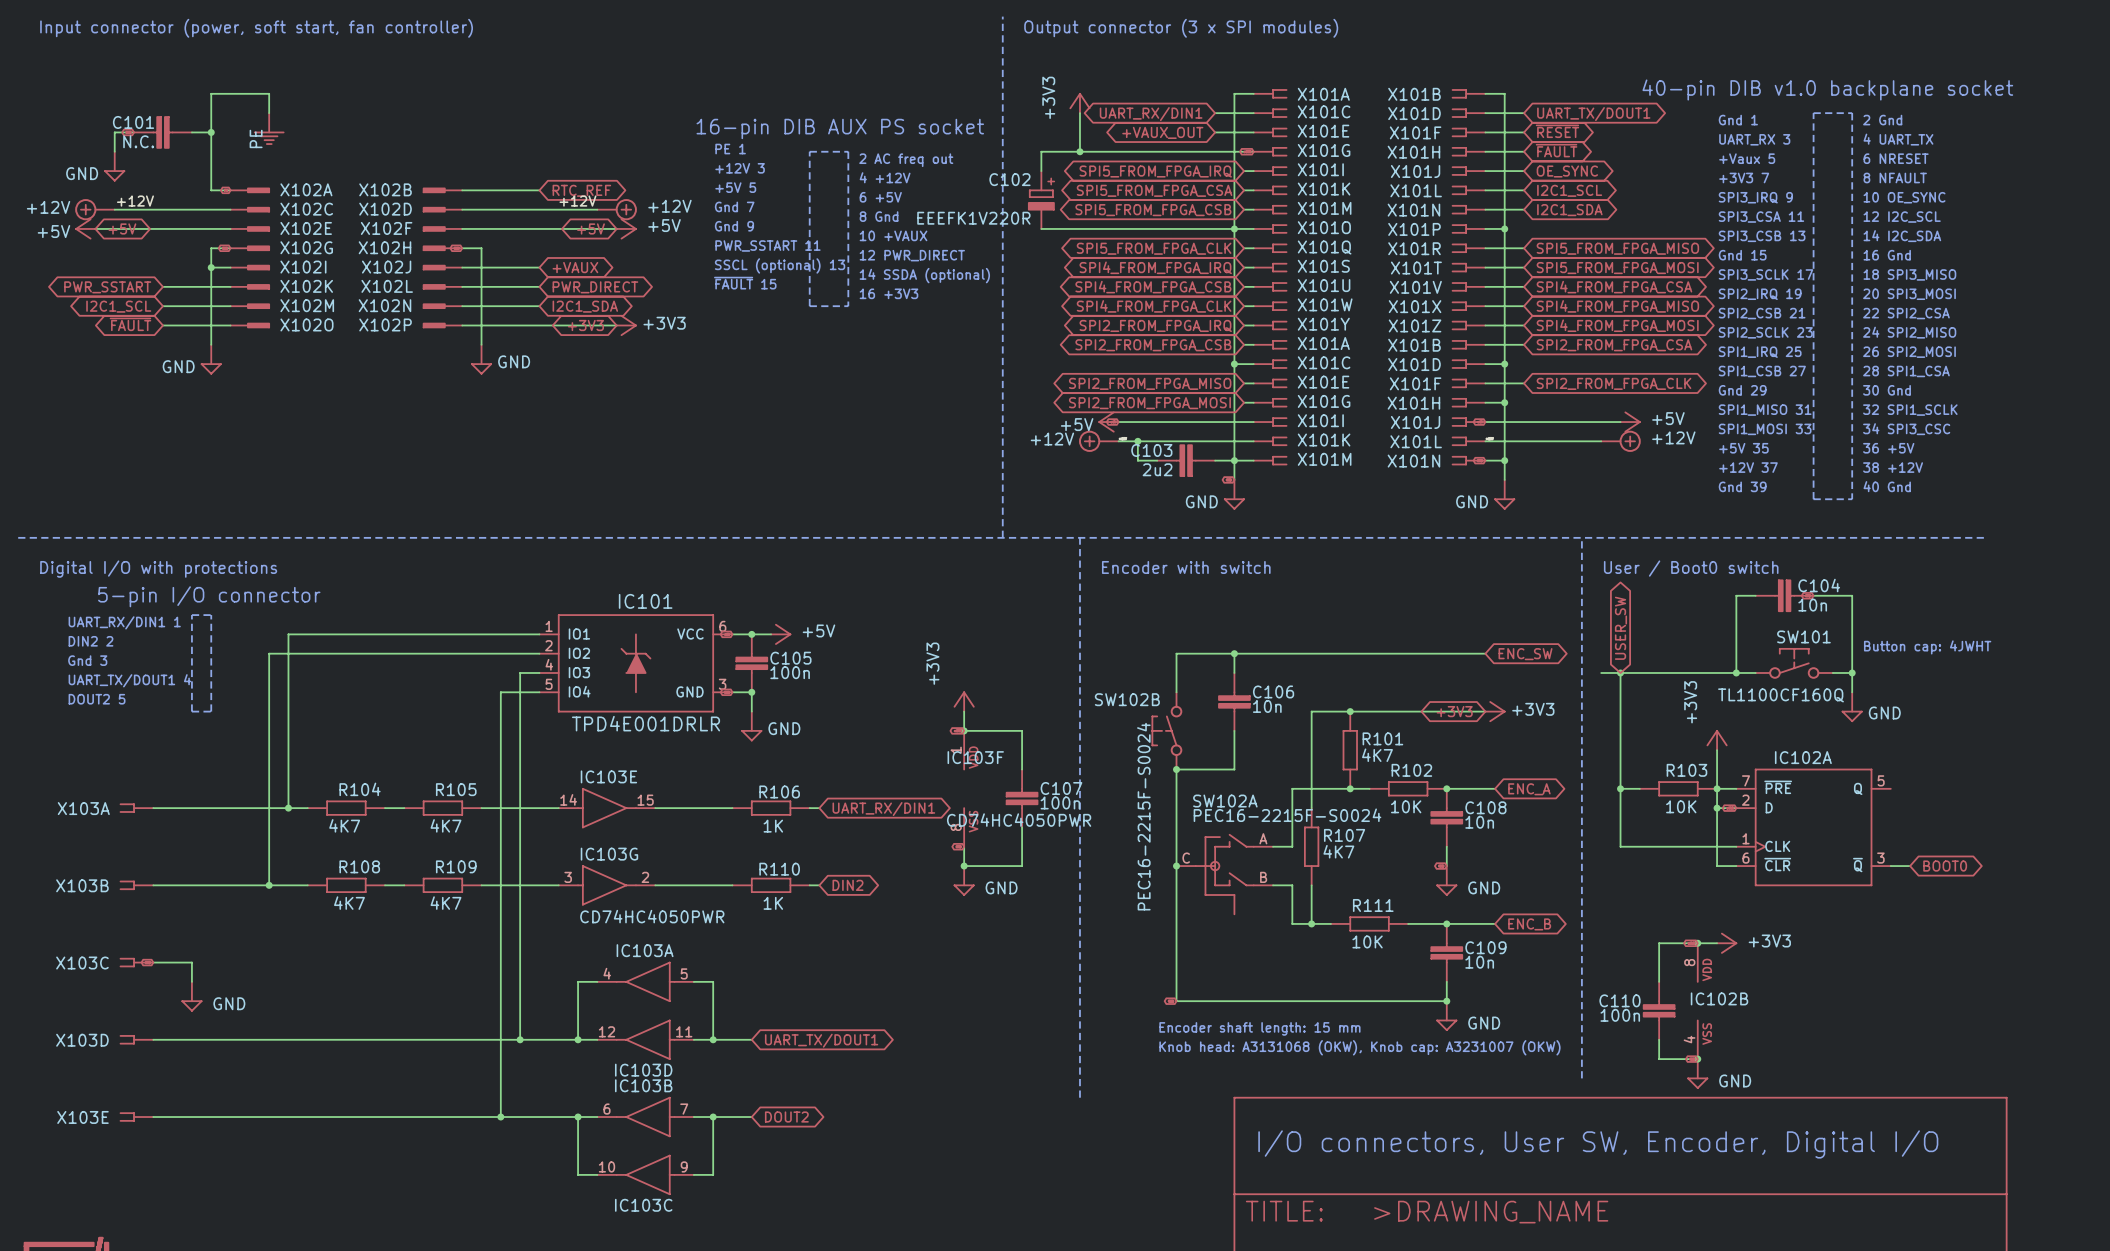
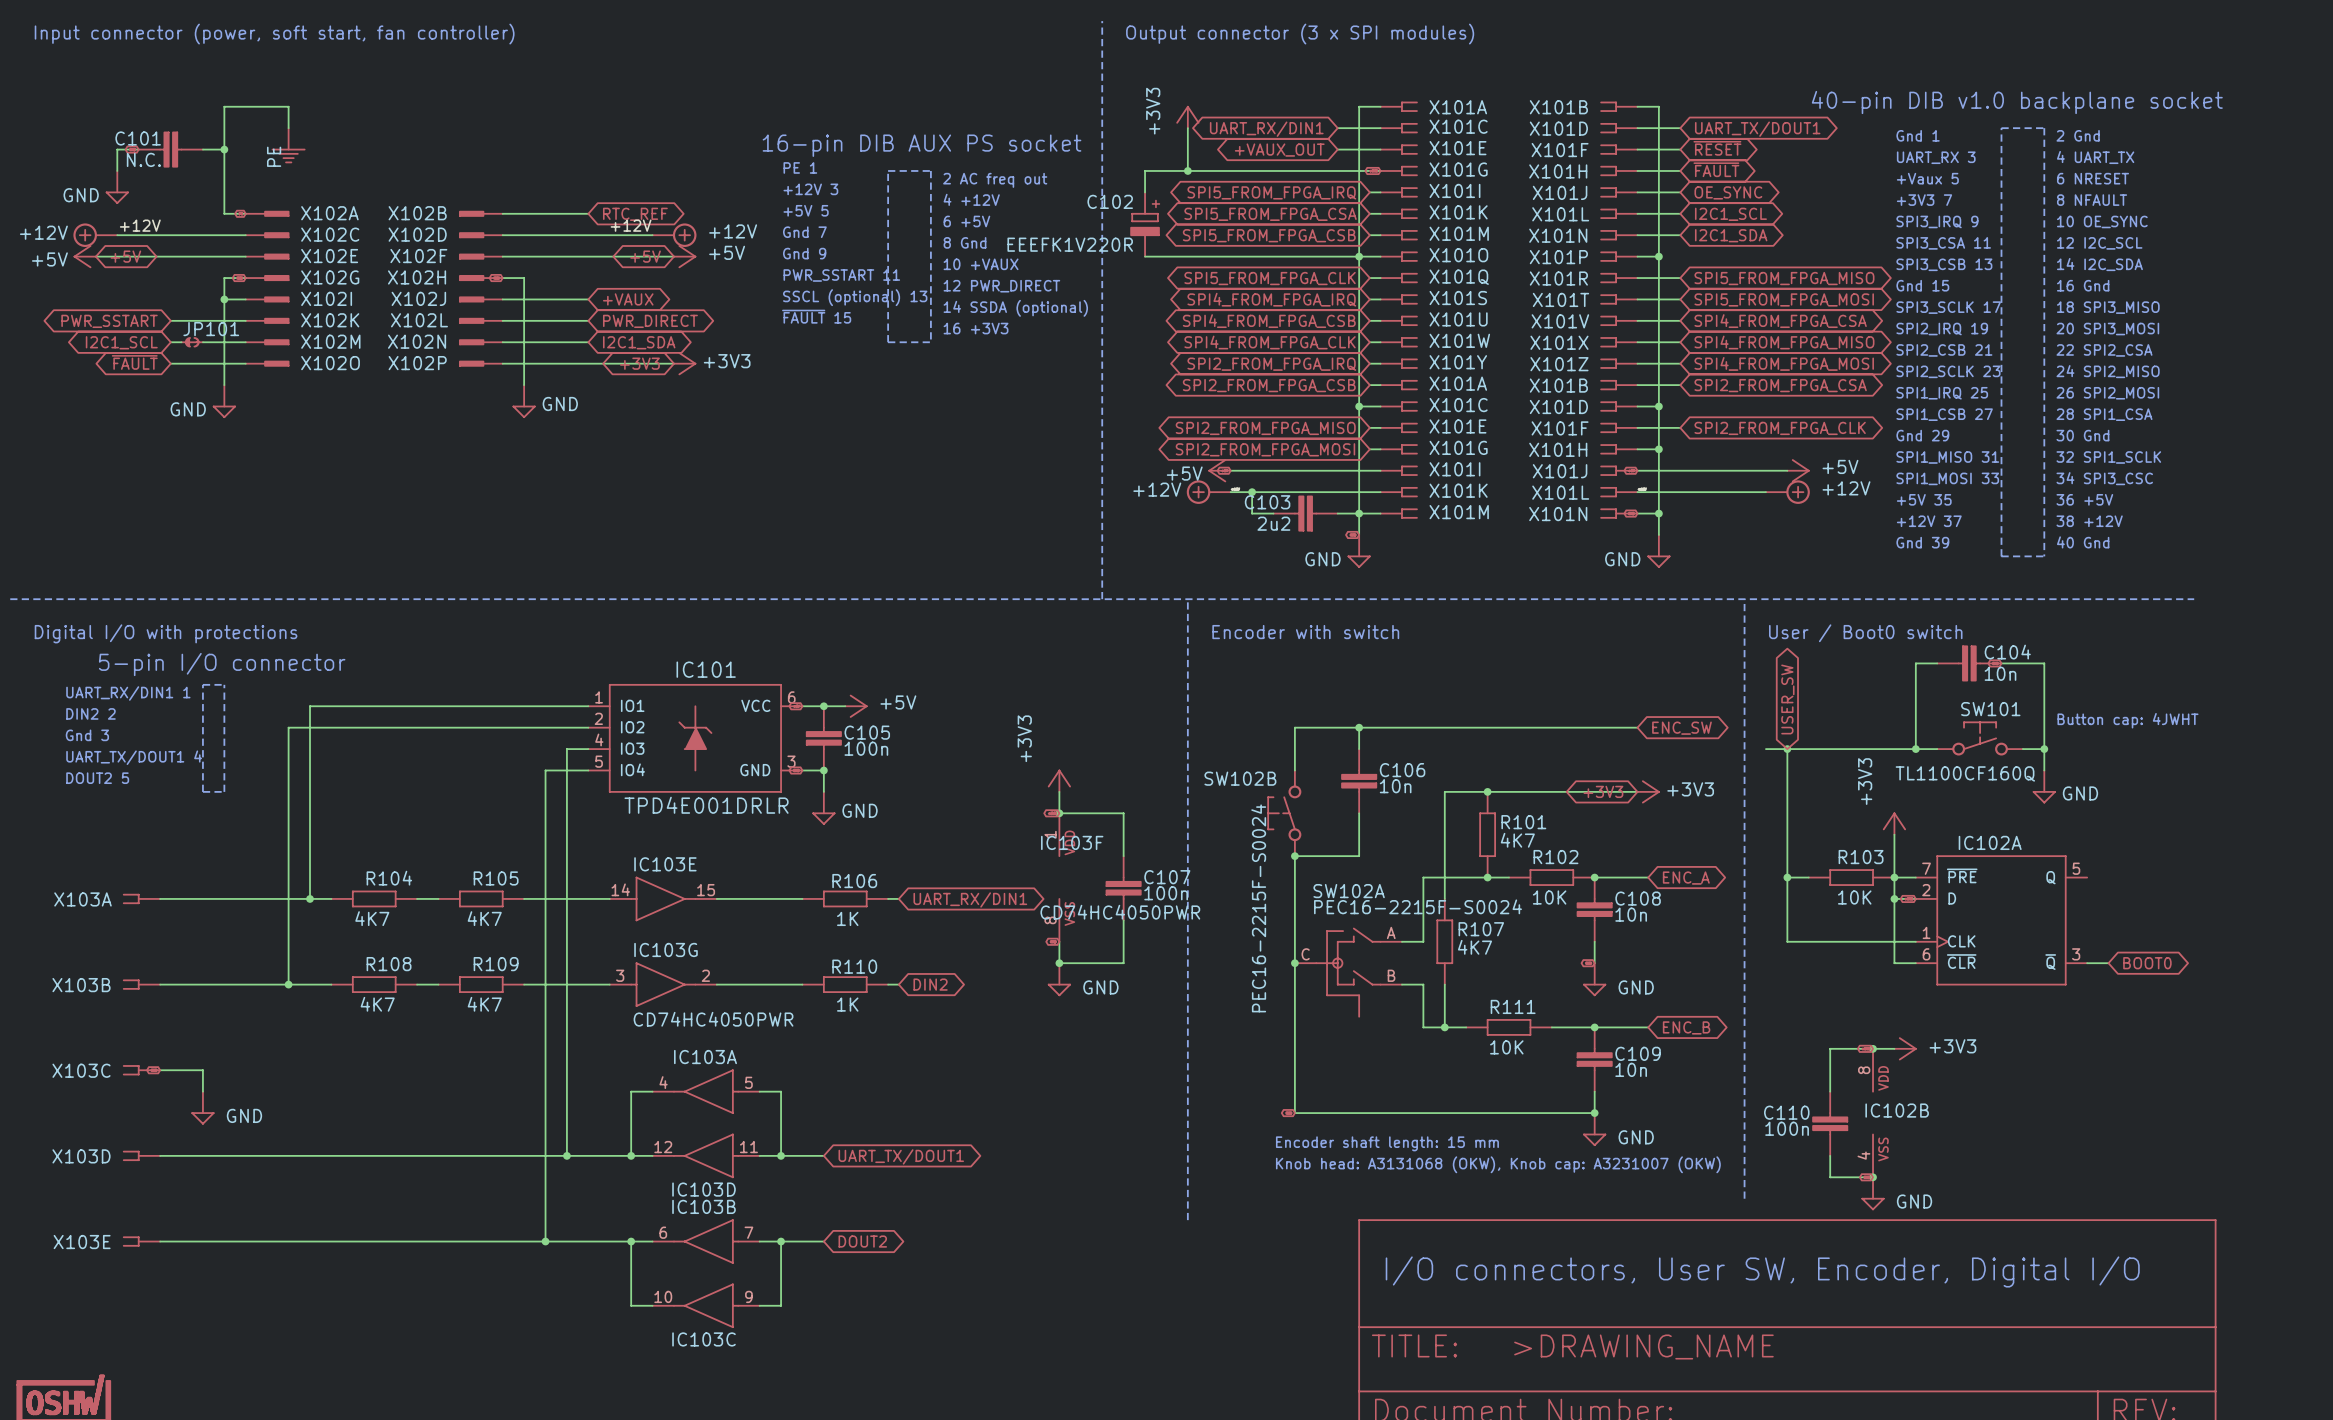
JP101: none -> (192, 342)

